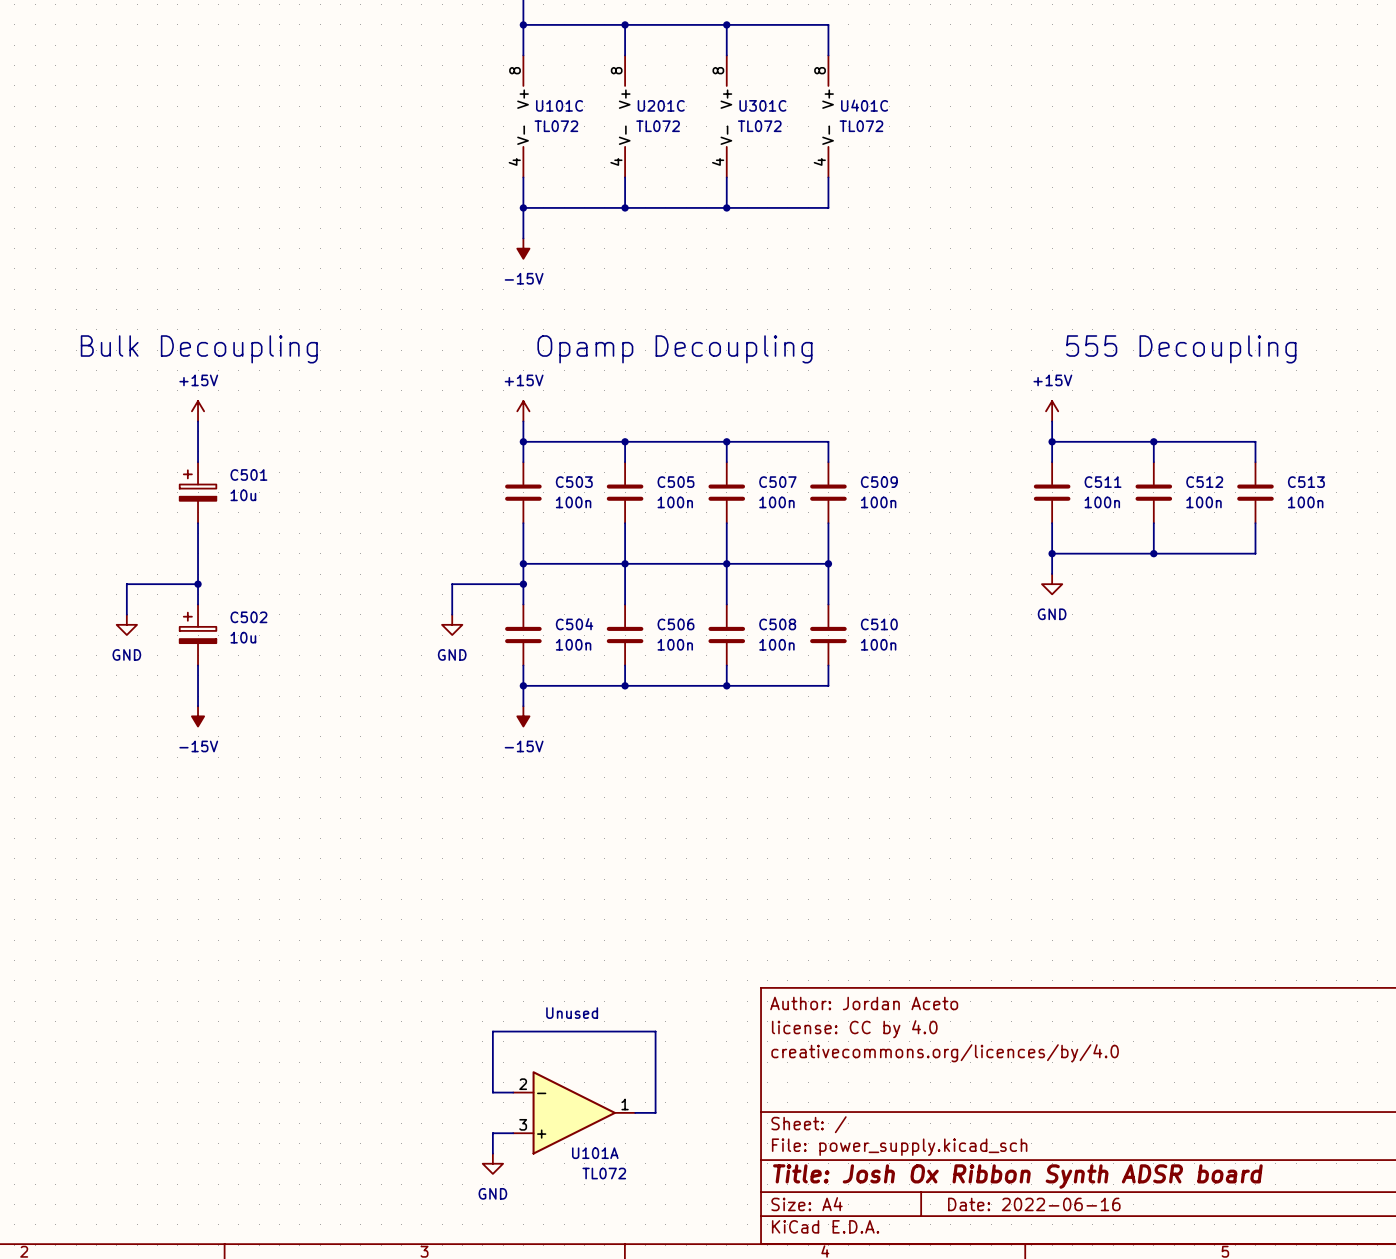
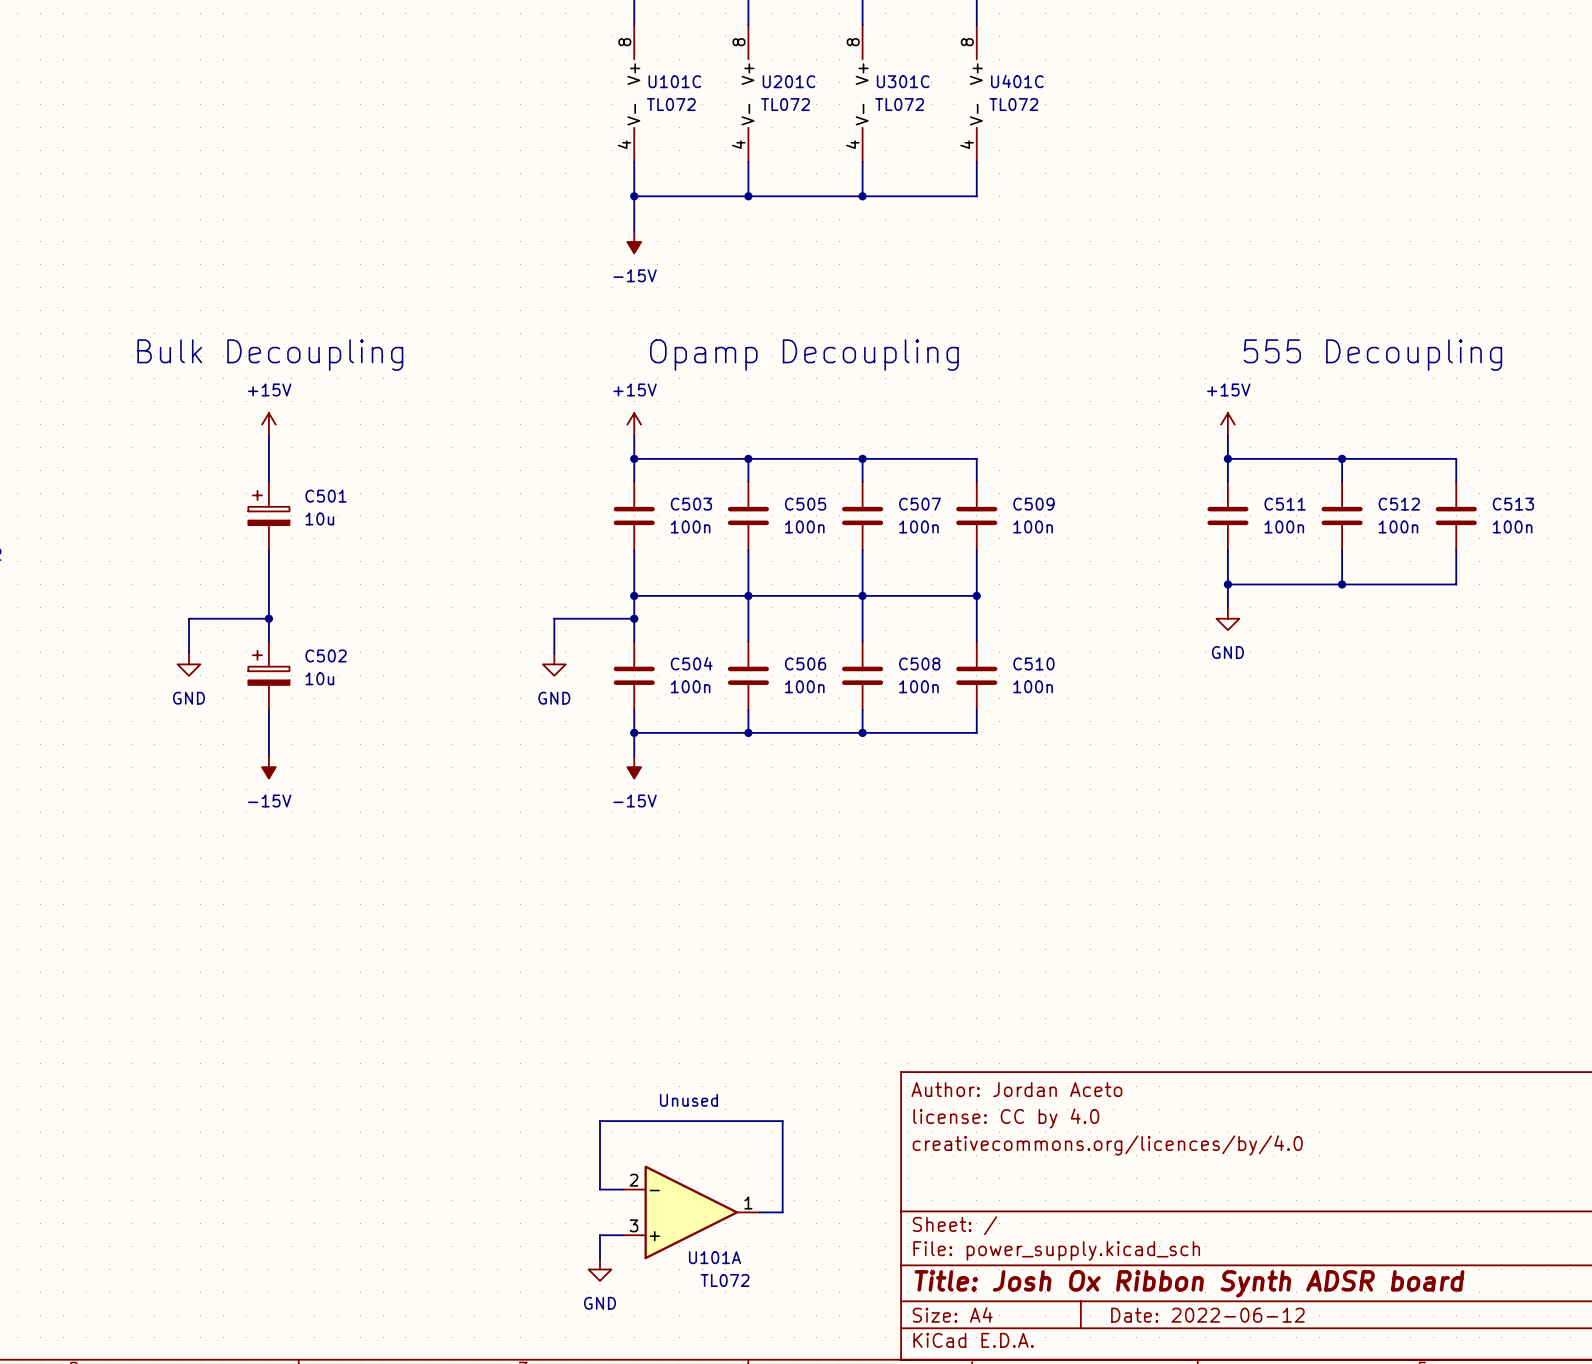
title block: Date: 2022-06-16 (1034, 1204) -> Date: 2022-06-12 (1207, 1315)

